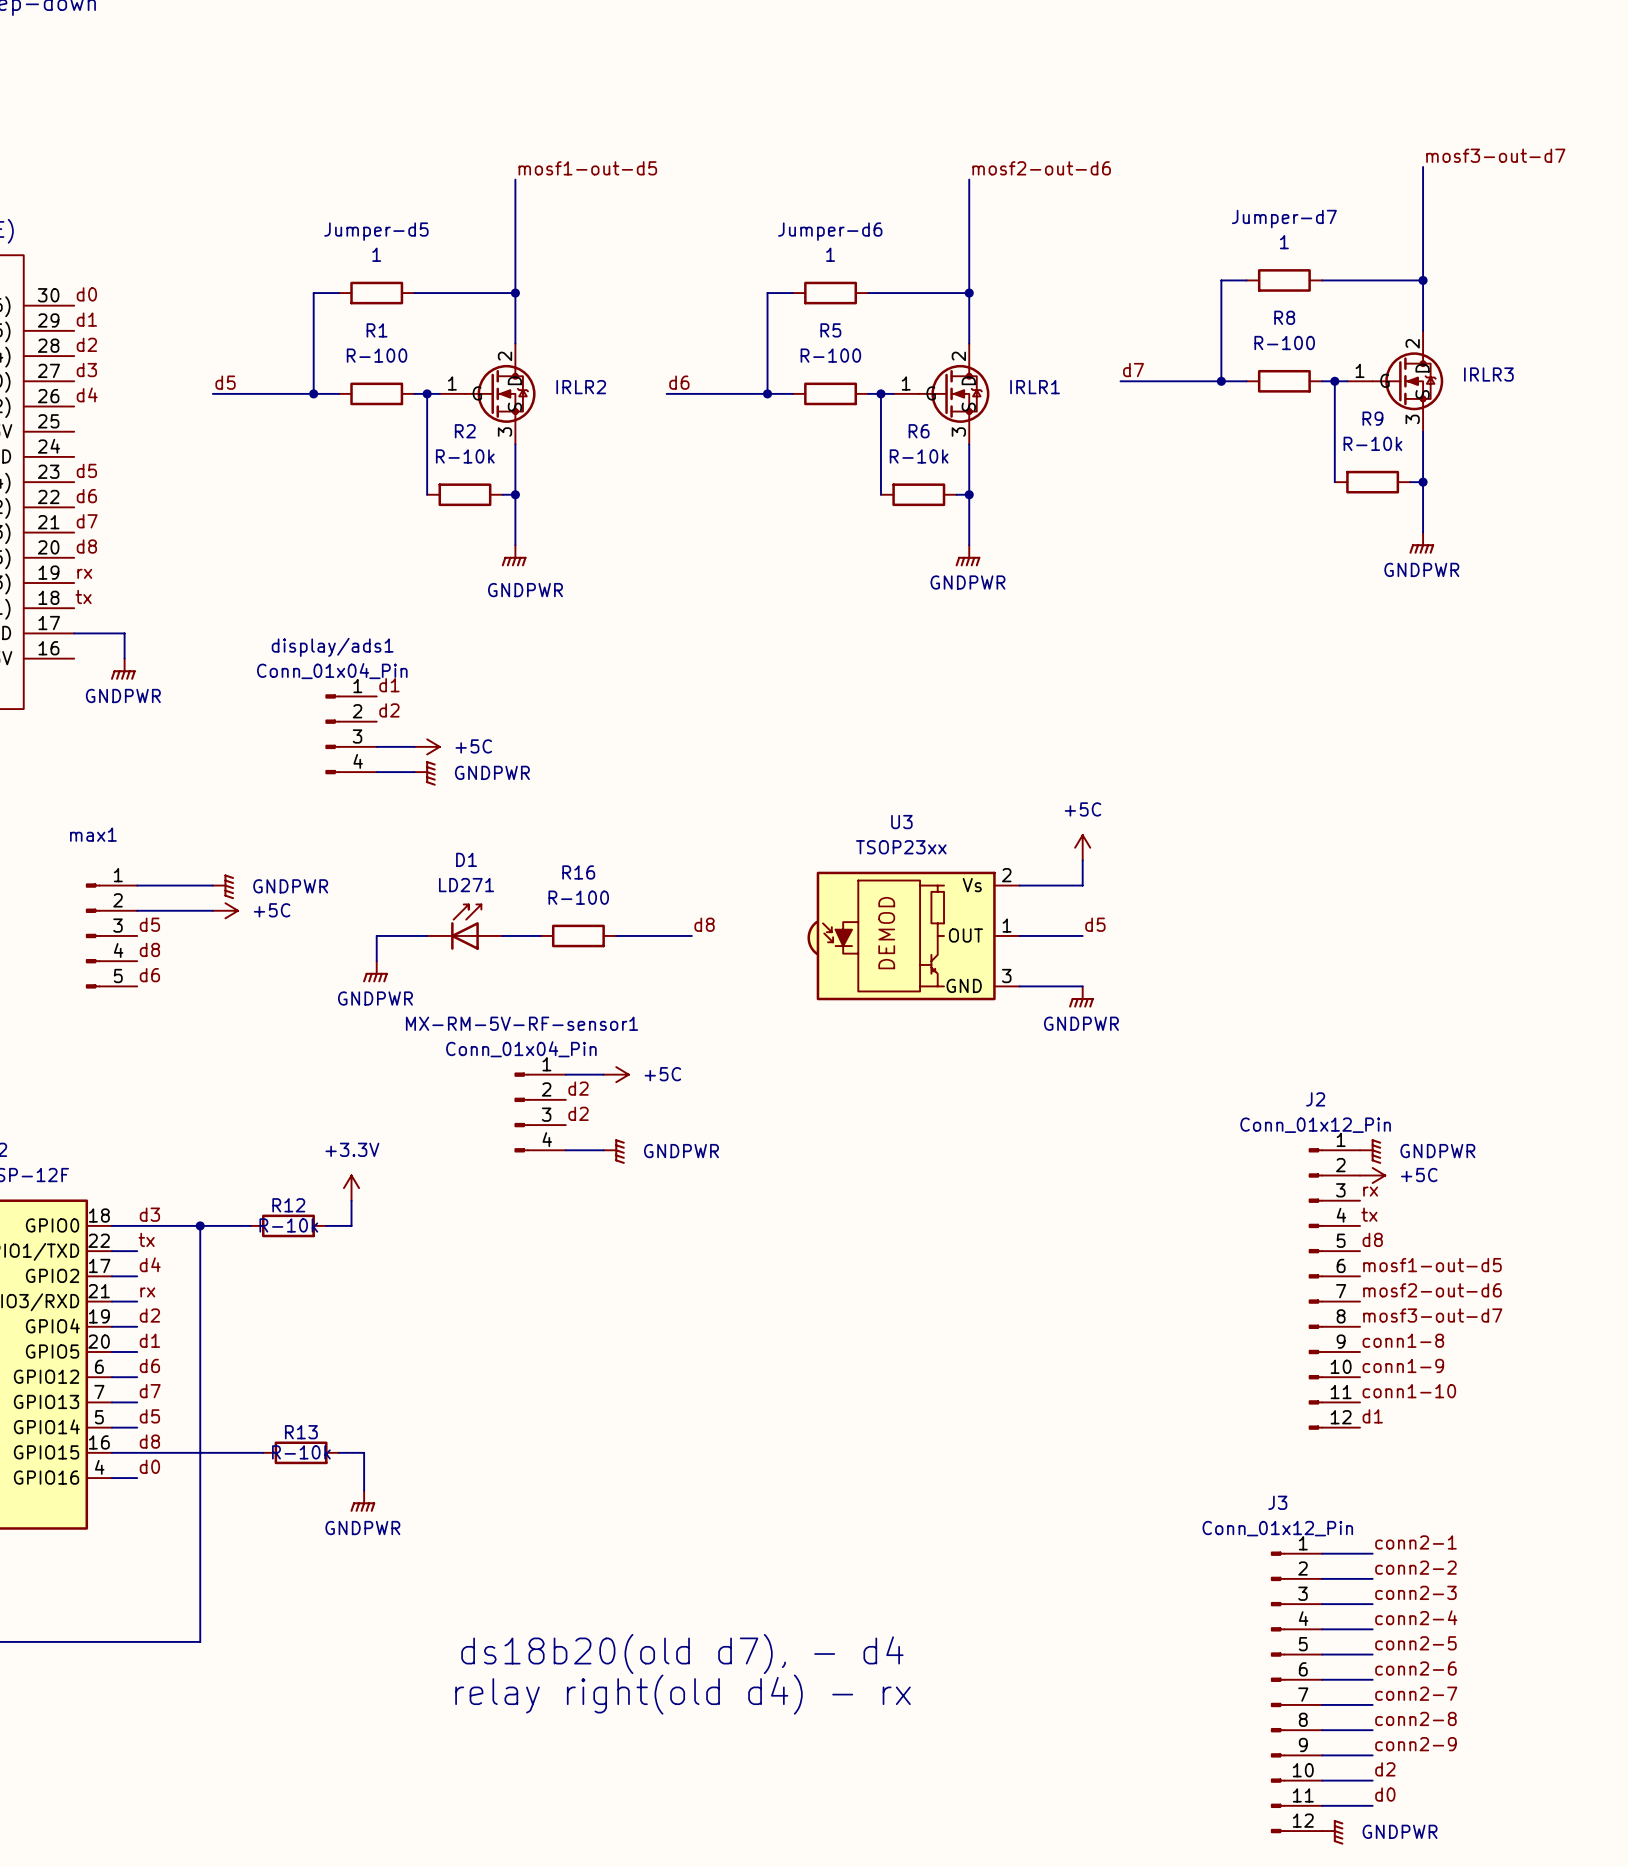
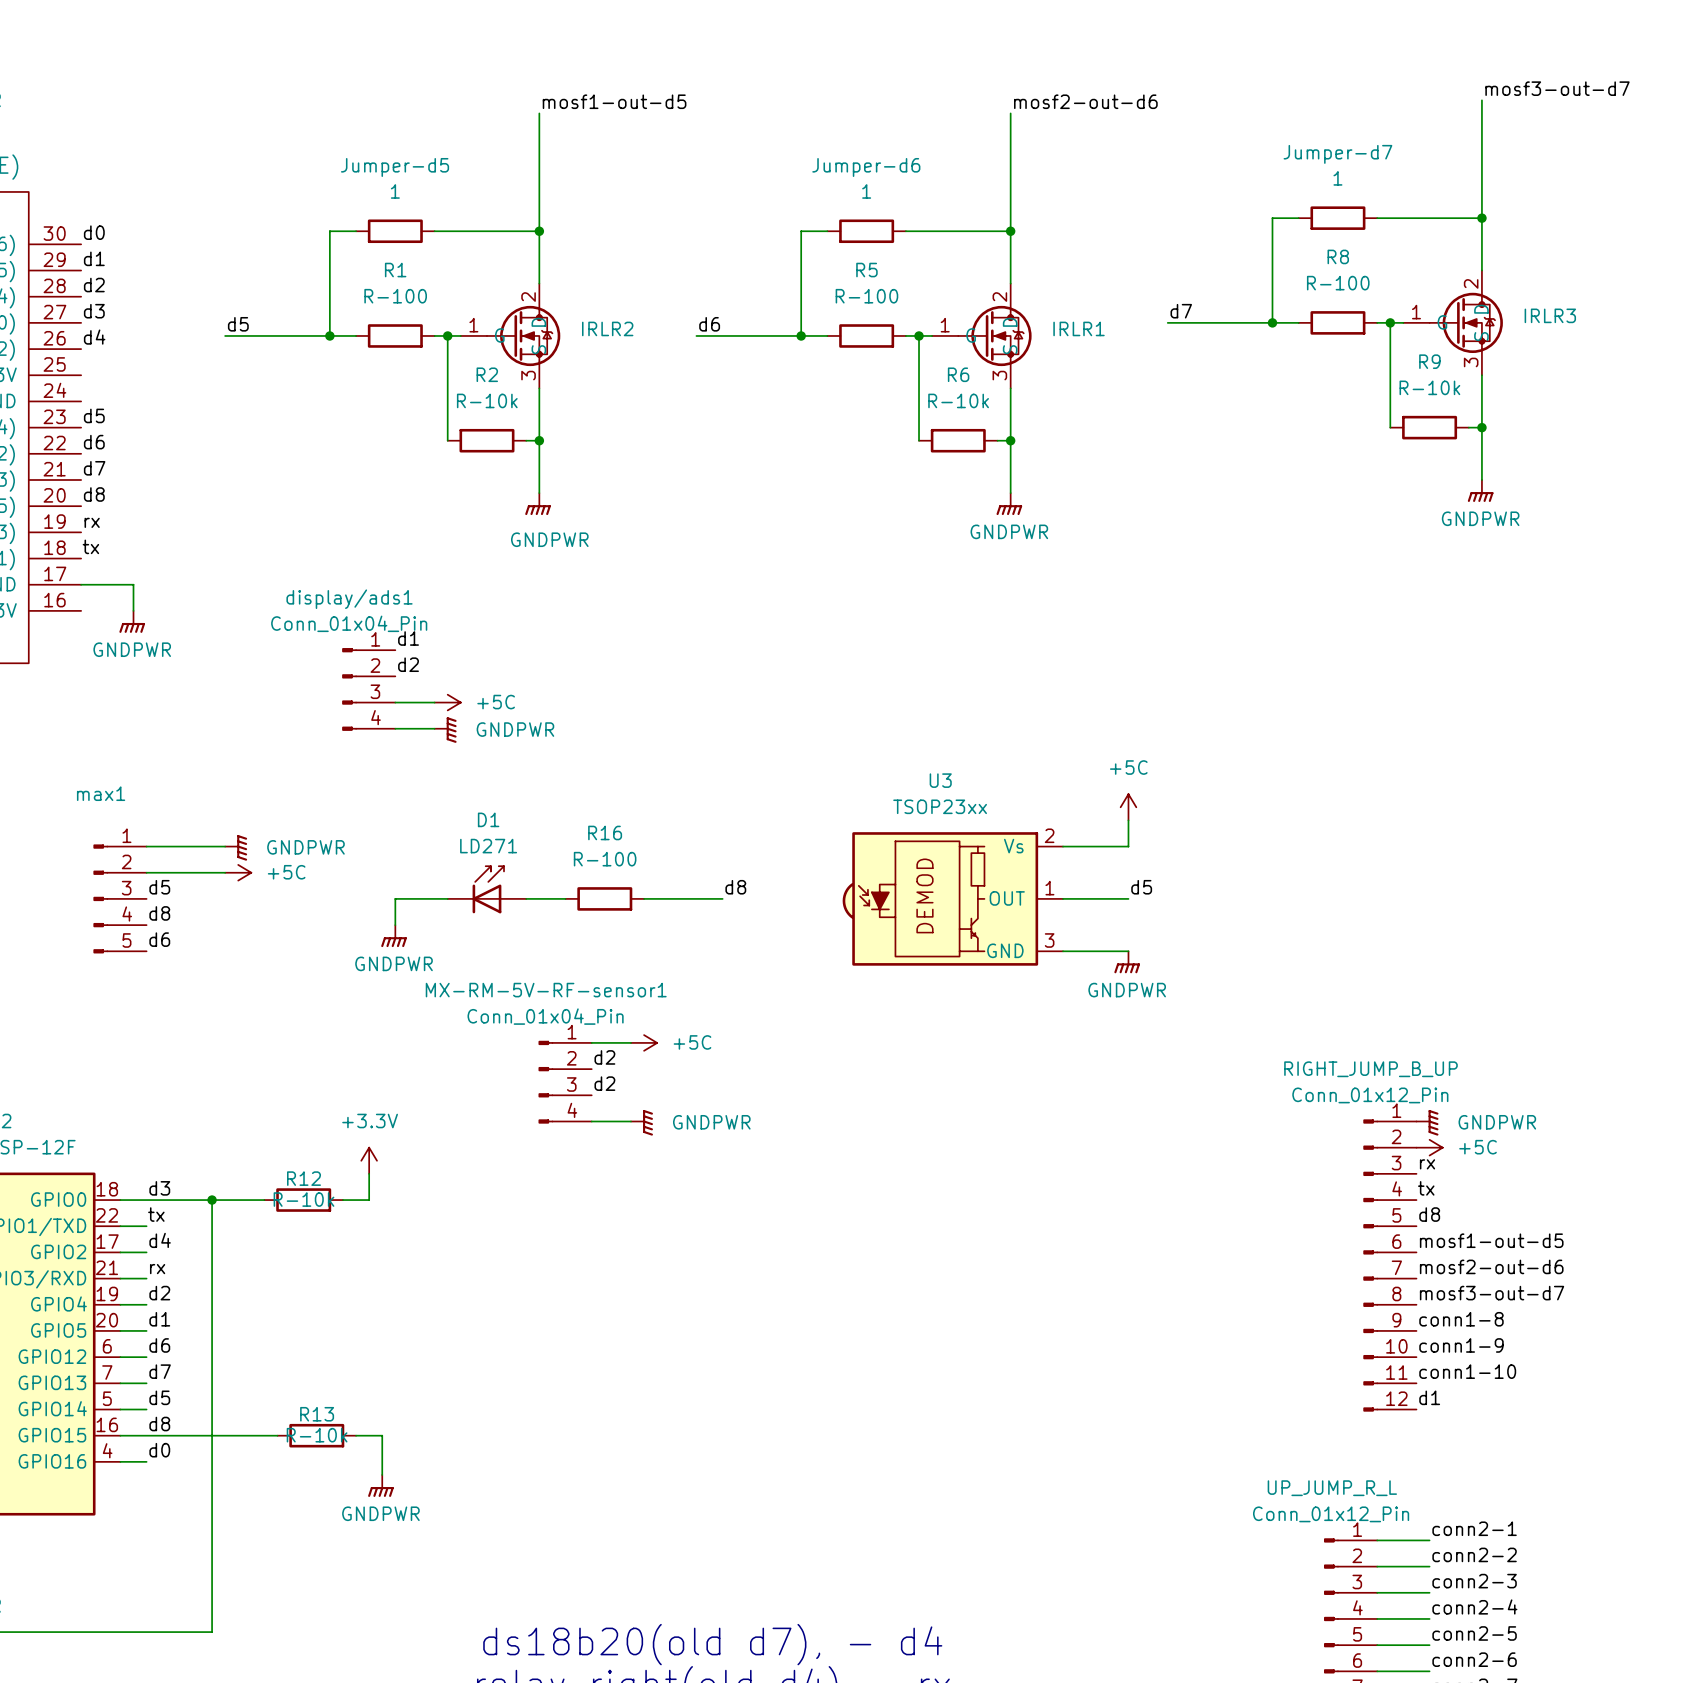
J2 name: J2 (1315, 1099) -> RIGHT_JUMP_B_UP (1370, 1069)
J3 name: J3 (1277, 1502) -> UP_JUMP_R_L (1332, 1488)

